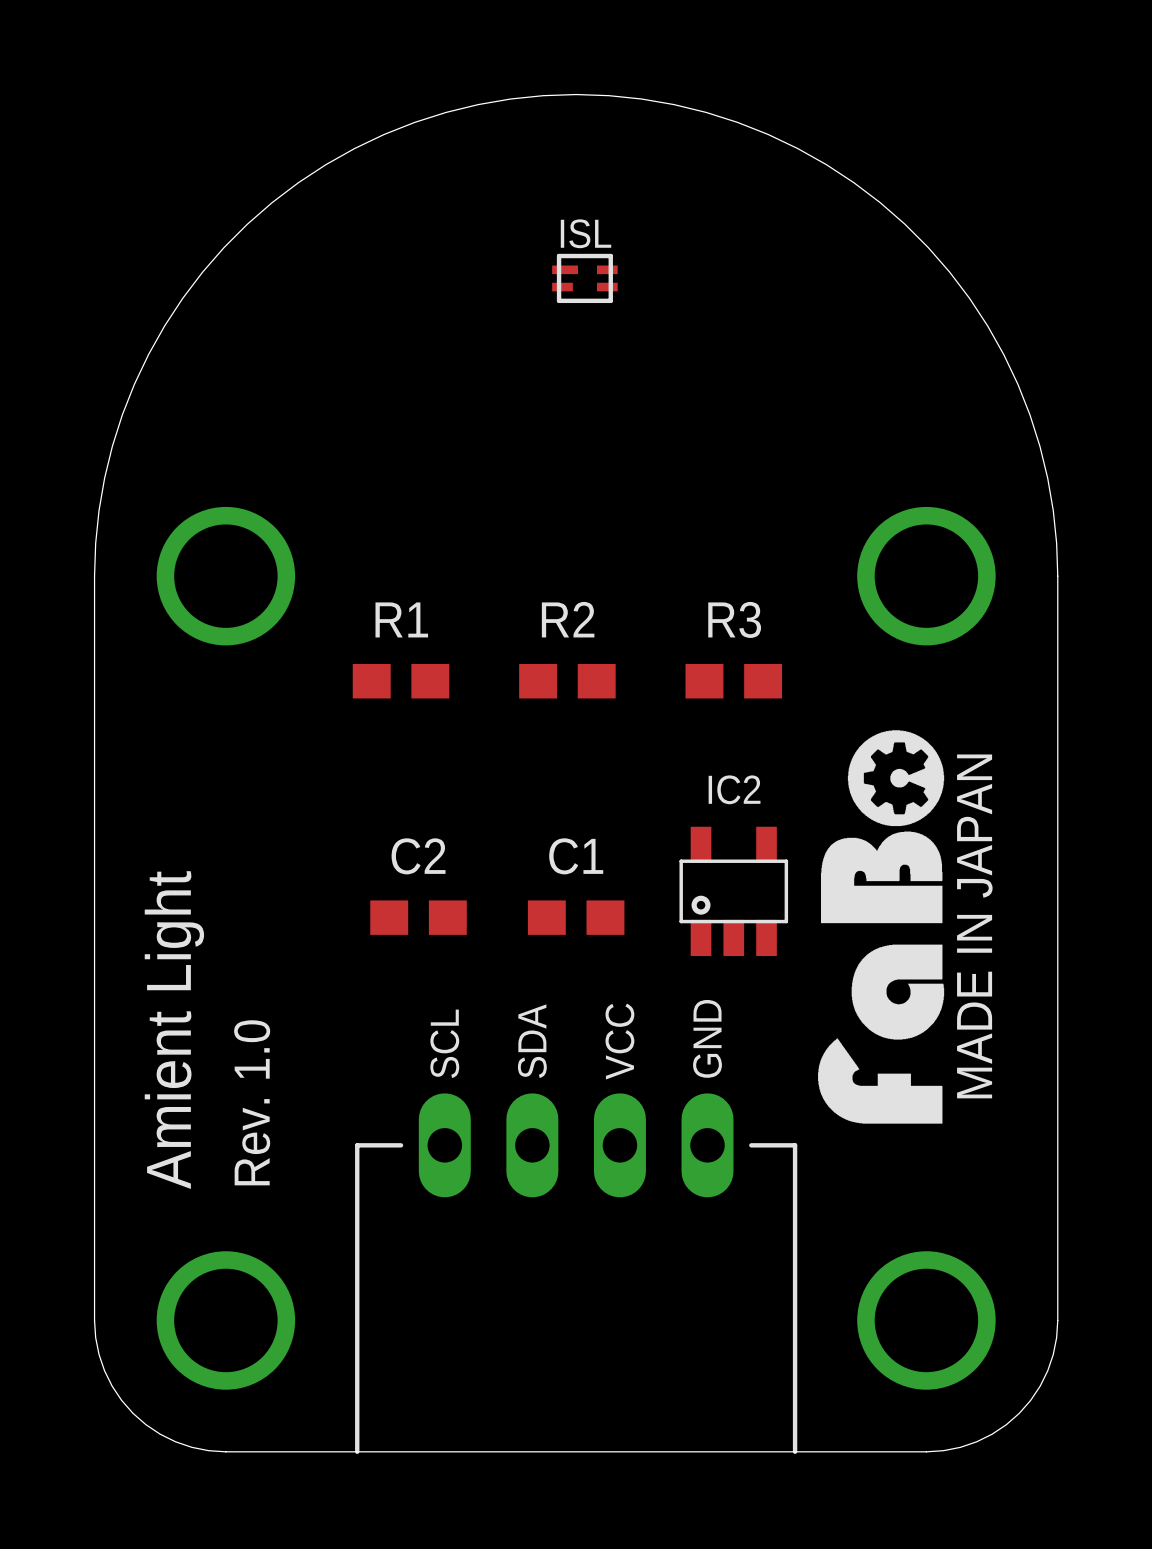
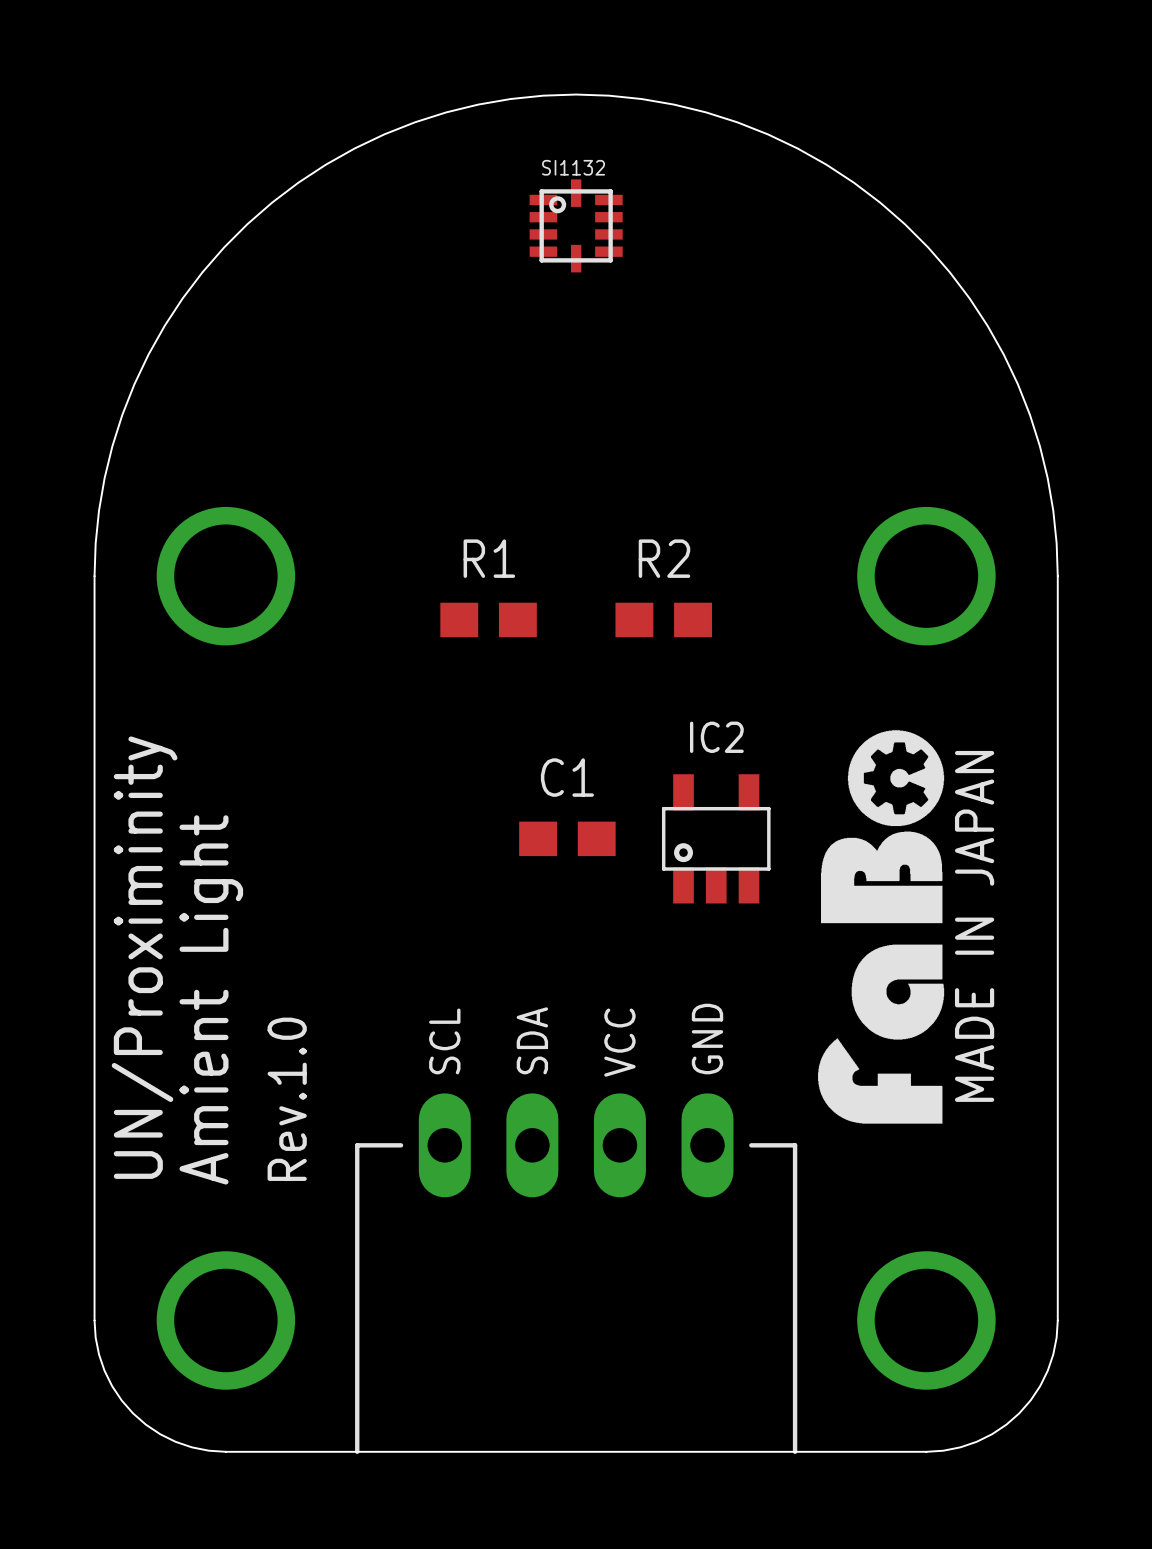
SI1132: none -> (576, 225)
ISL: (584, 278) -> none
R1 position: (401, 681) -> (488, 619)
R2 position: (567, 681) -> (663, 619)
R3: (733, 681) -> none
IC2 position: (733, 891) -> (716, 838)
C2: (418, 917) -> none
C1 position: (576, 917) -> (567, 838)
text: none -> UN/Proximinity (144, 957)
text position: Amient Light (174, 1030) -> Amient Light (211, 999)
text: Rev. 1.0 (252, 1102) -> Rev.1.0 (287, 1099)

